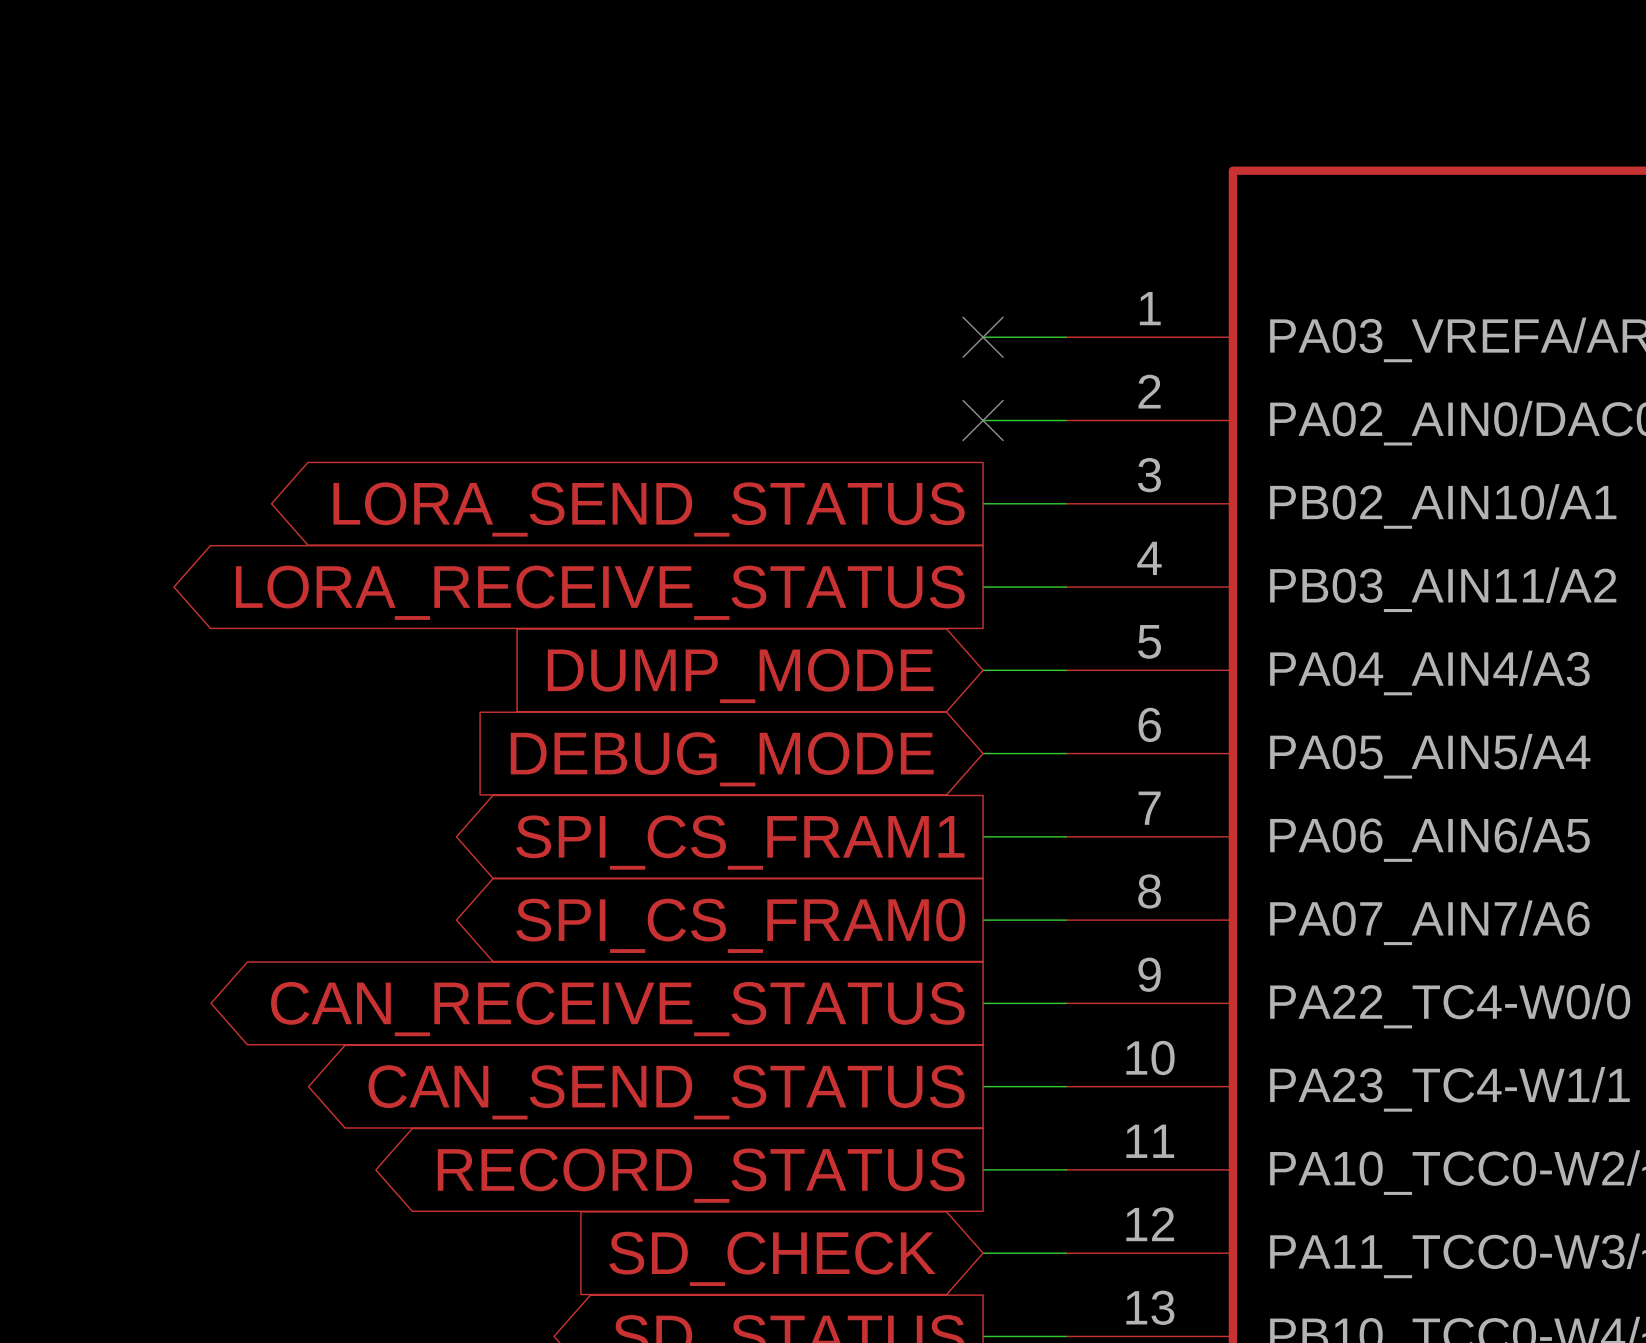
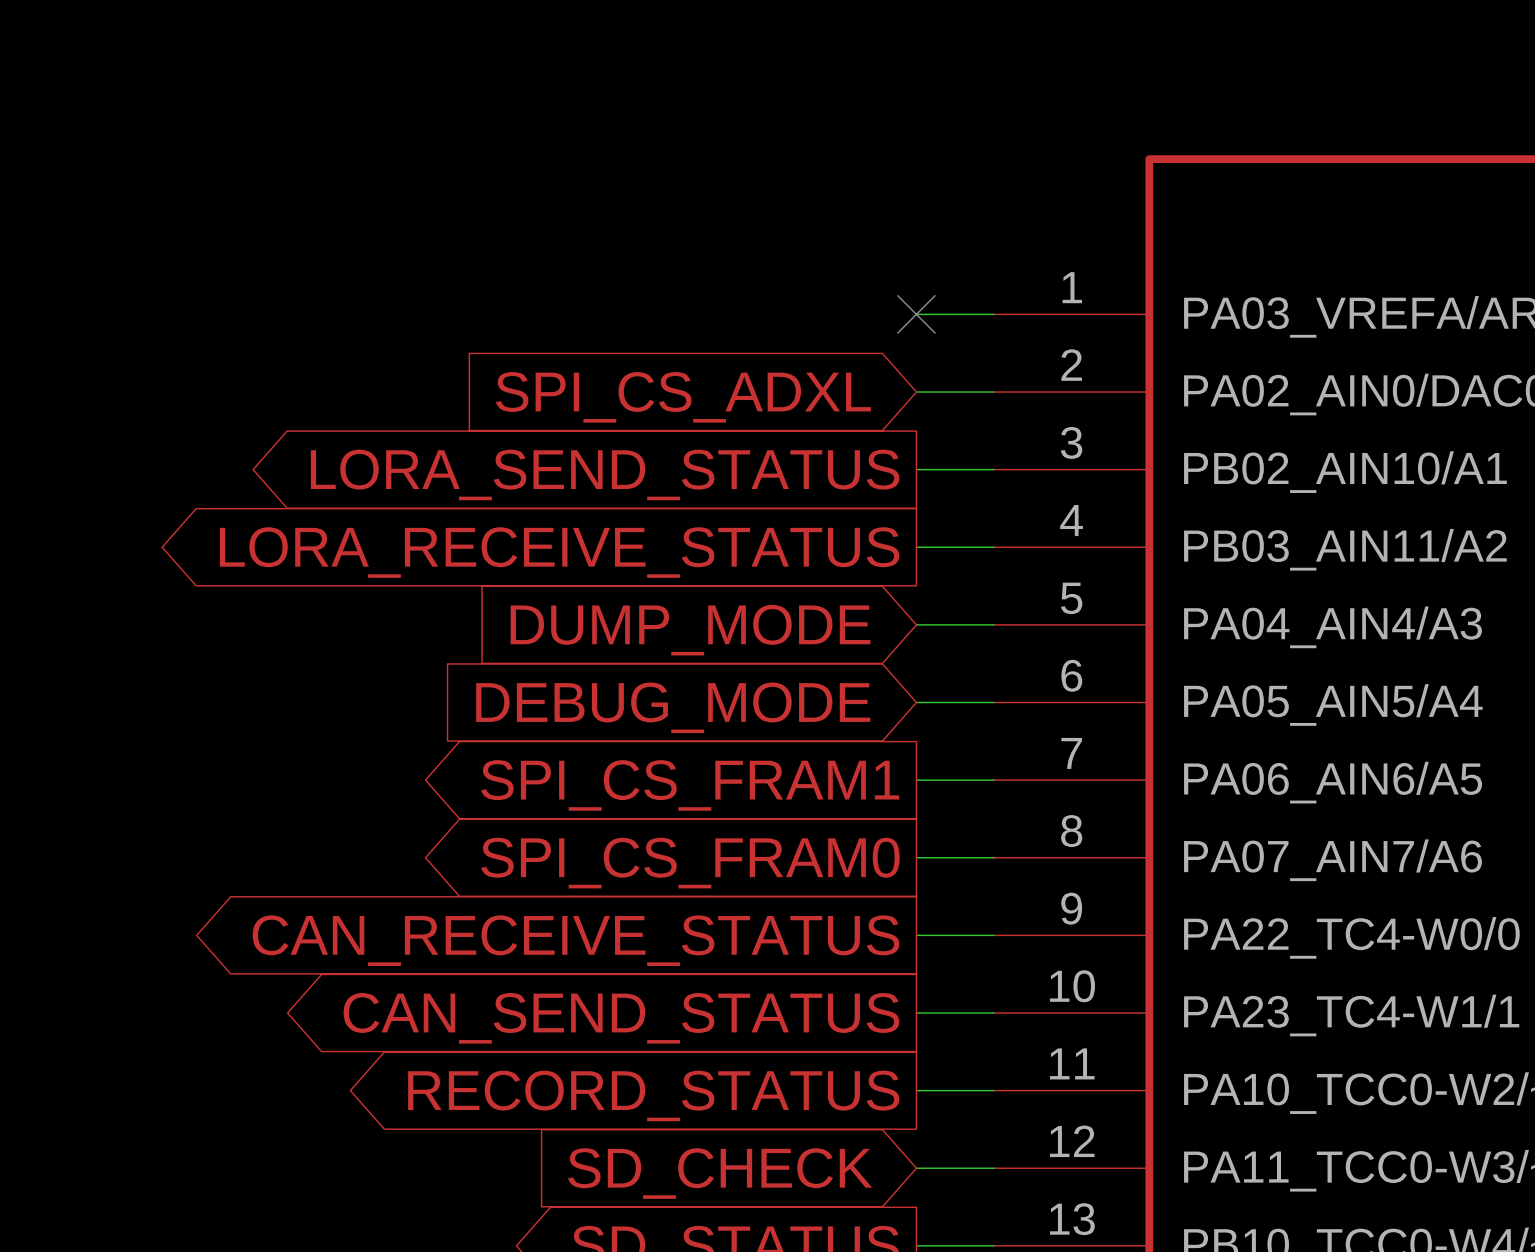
no-connect mark: (983, 420) -> none
global label: none -> SPI_CS_ADXL (683, 397)

